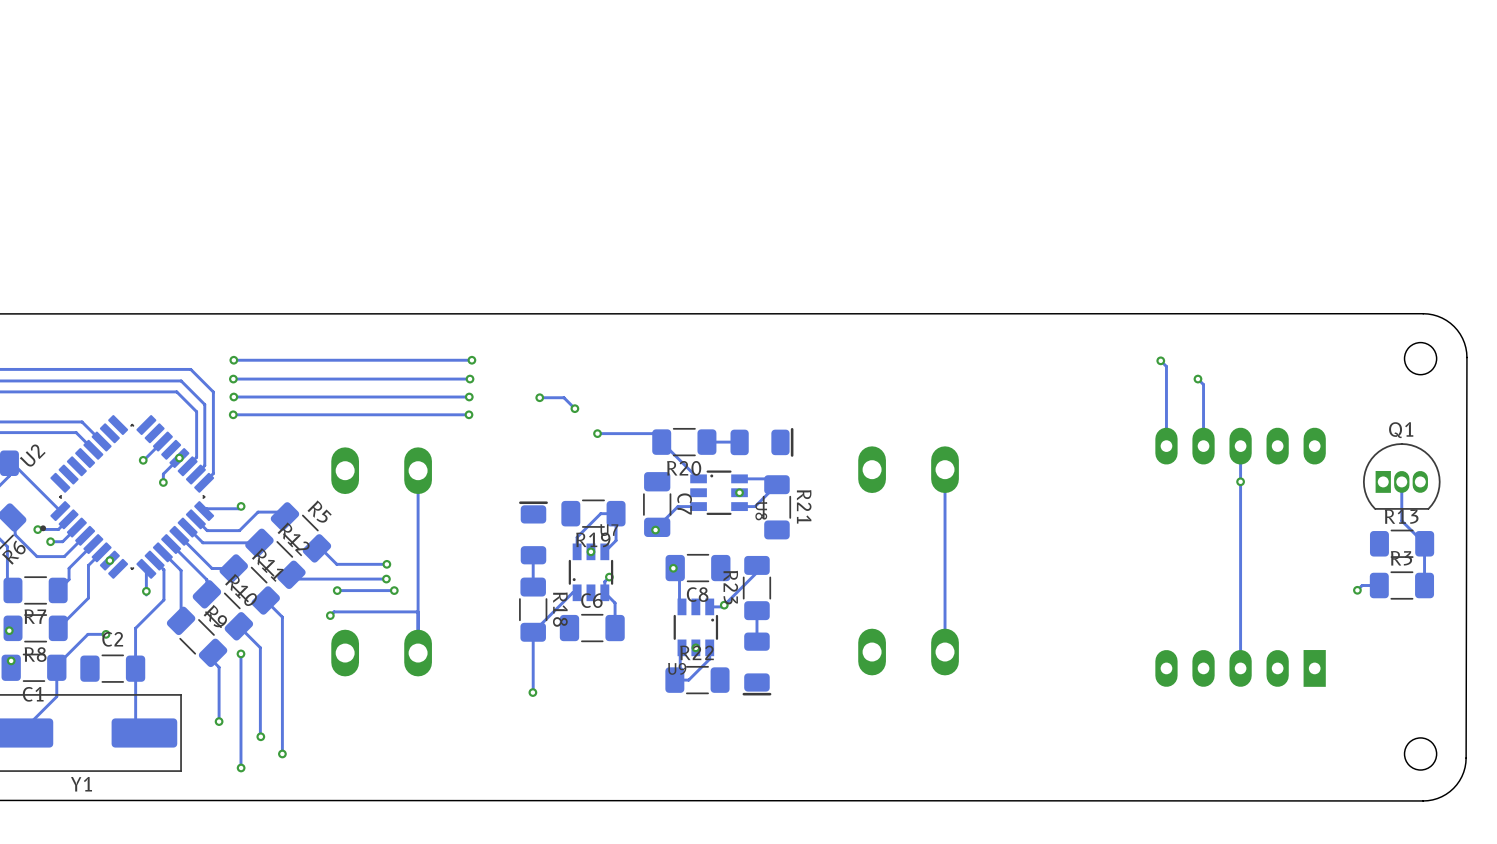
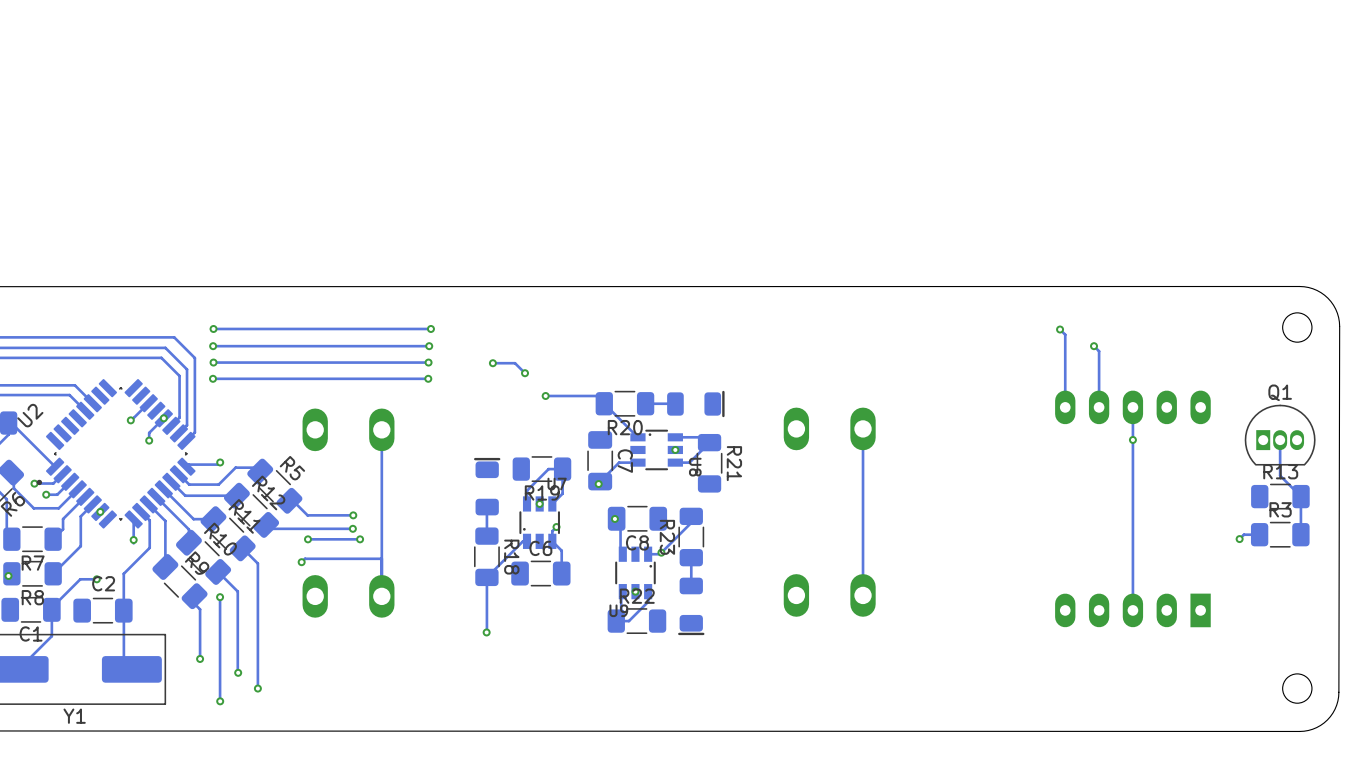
via: (11, 660) -> none

